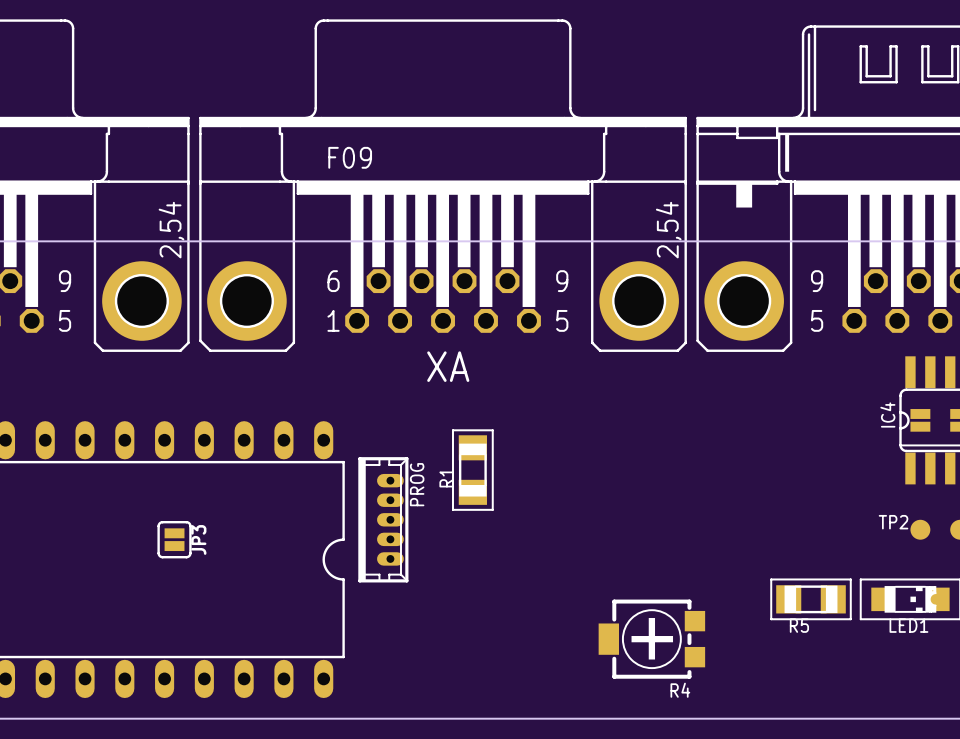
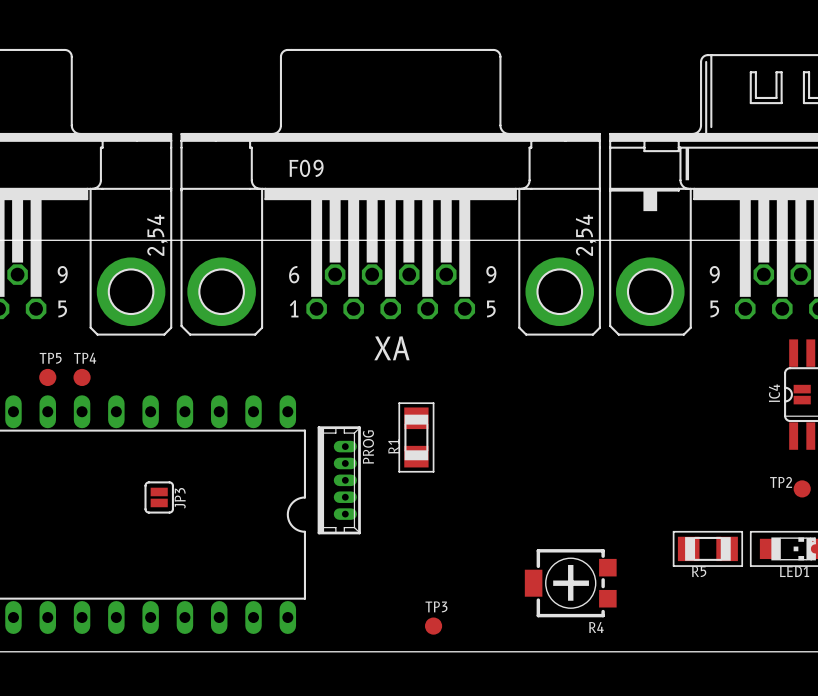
TP5: none -> (47, 377)
TP4: none -> (82, 377)
TP3: none -> (433, 626)

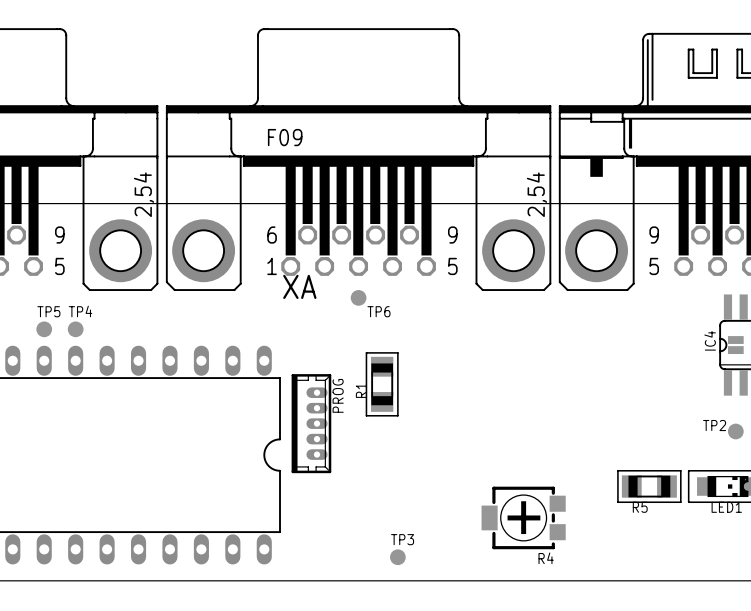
TP6: none -> (358, 297)
XA name position: XA (391, 348) -> XA (299, 286)
JP3: (159, 497) -> none

